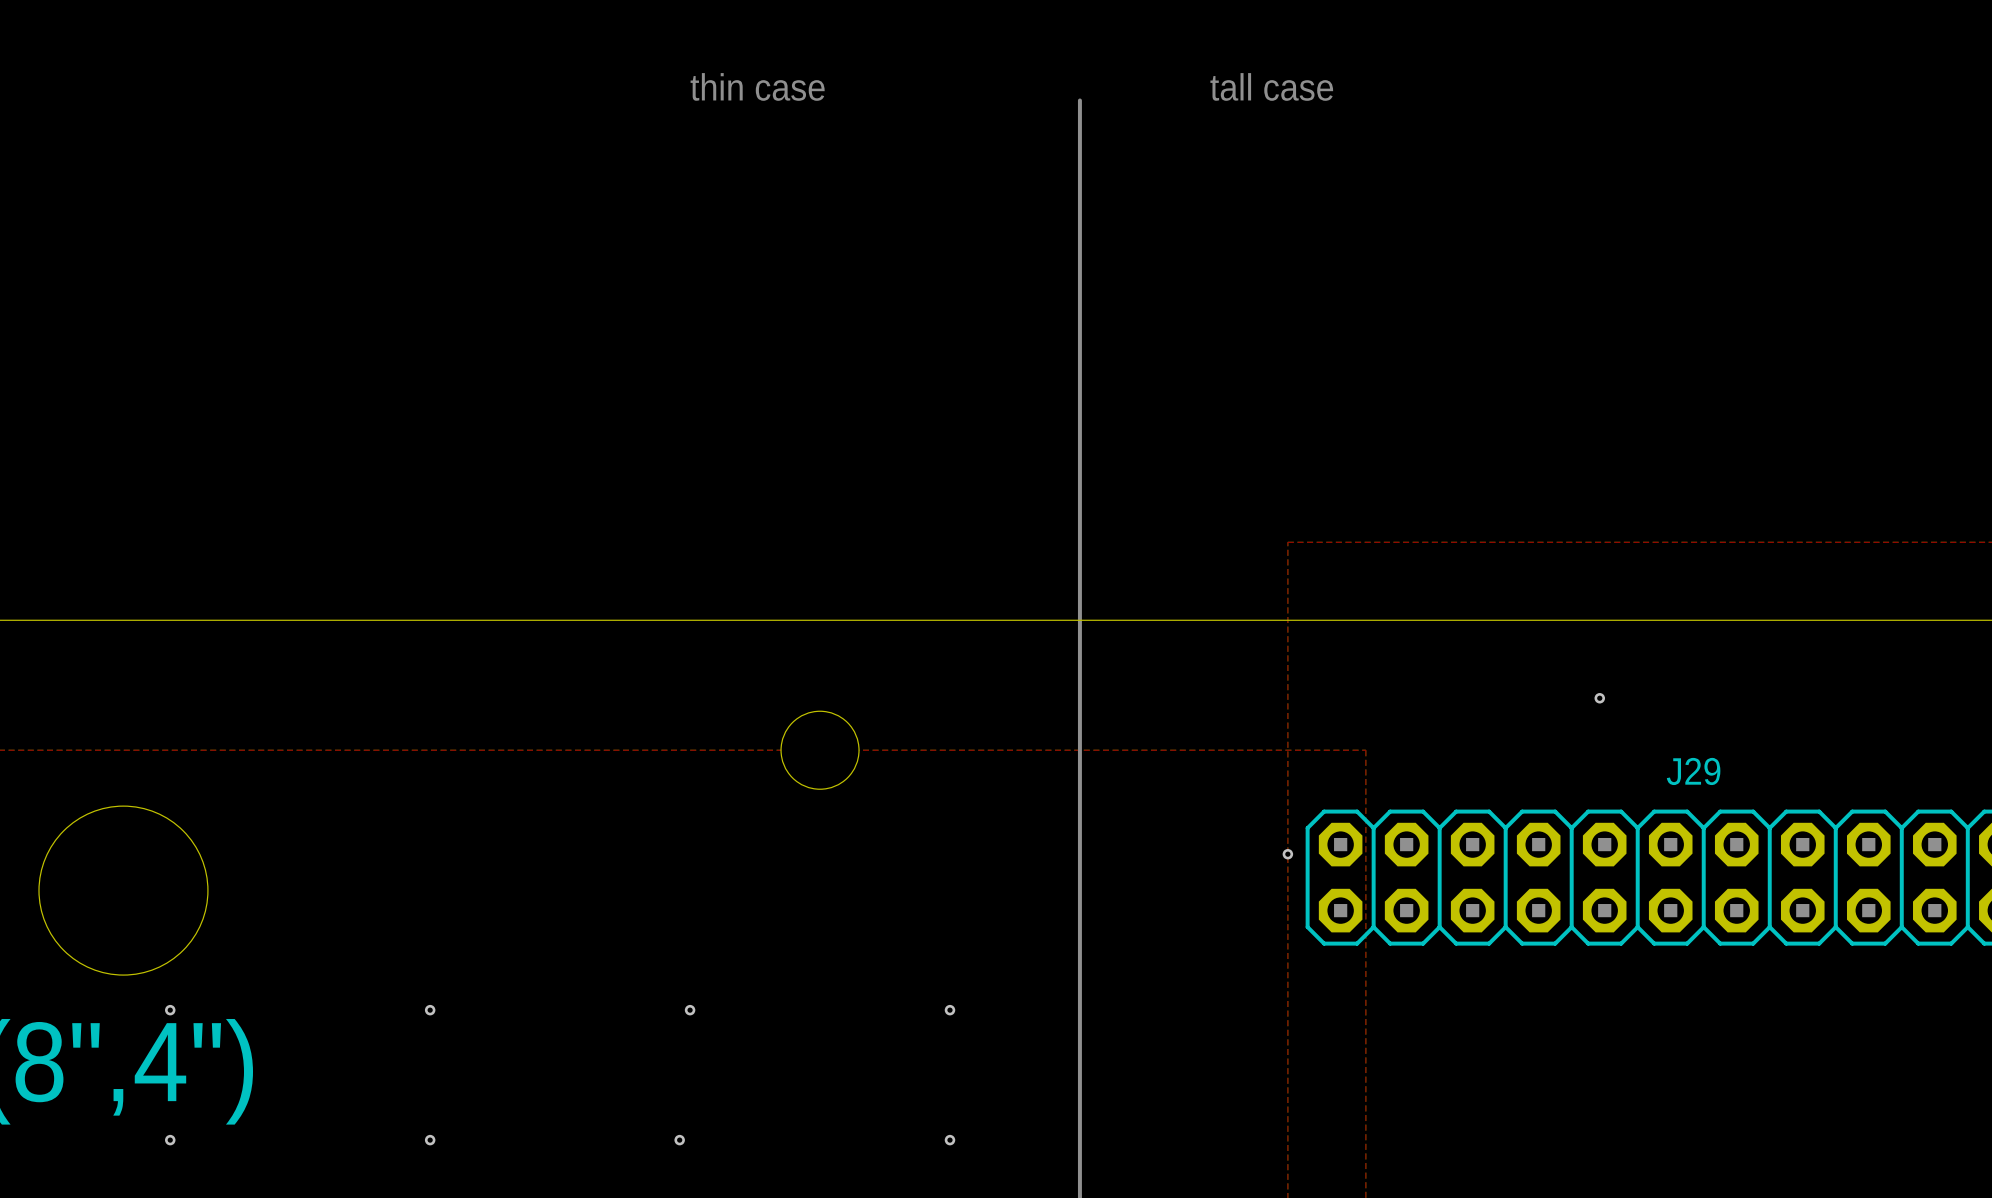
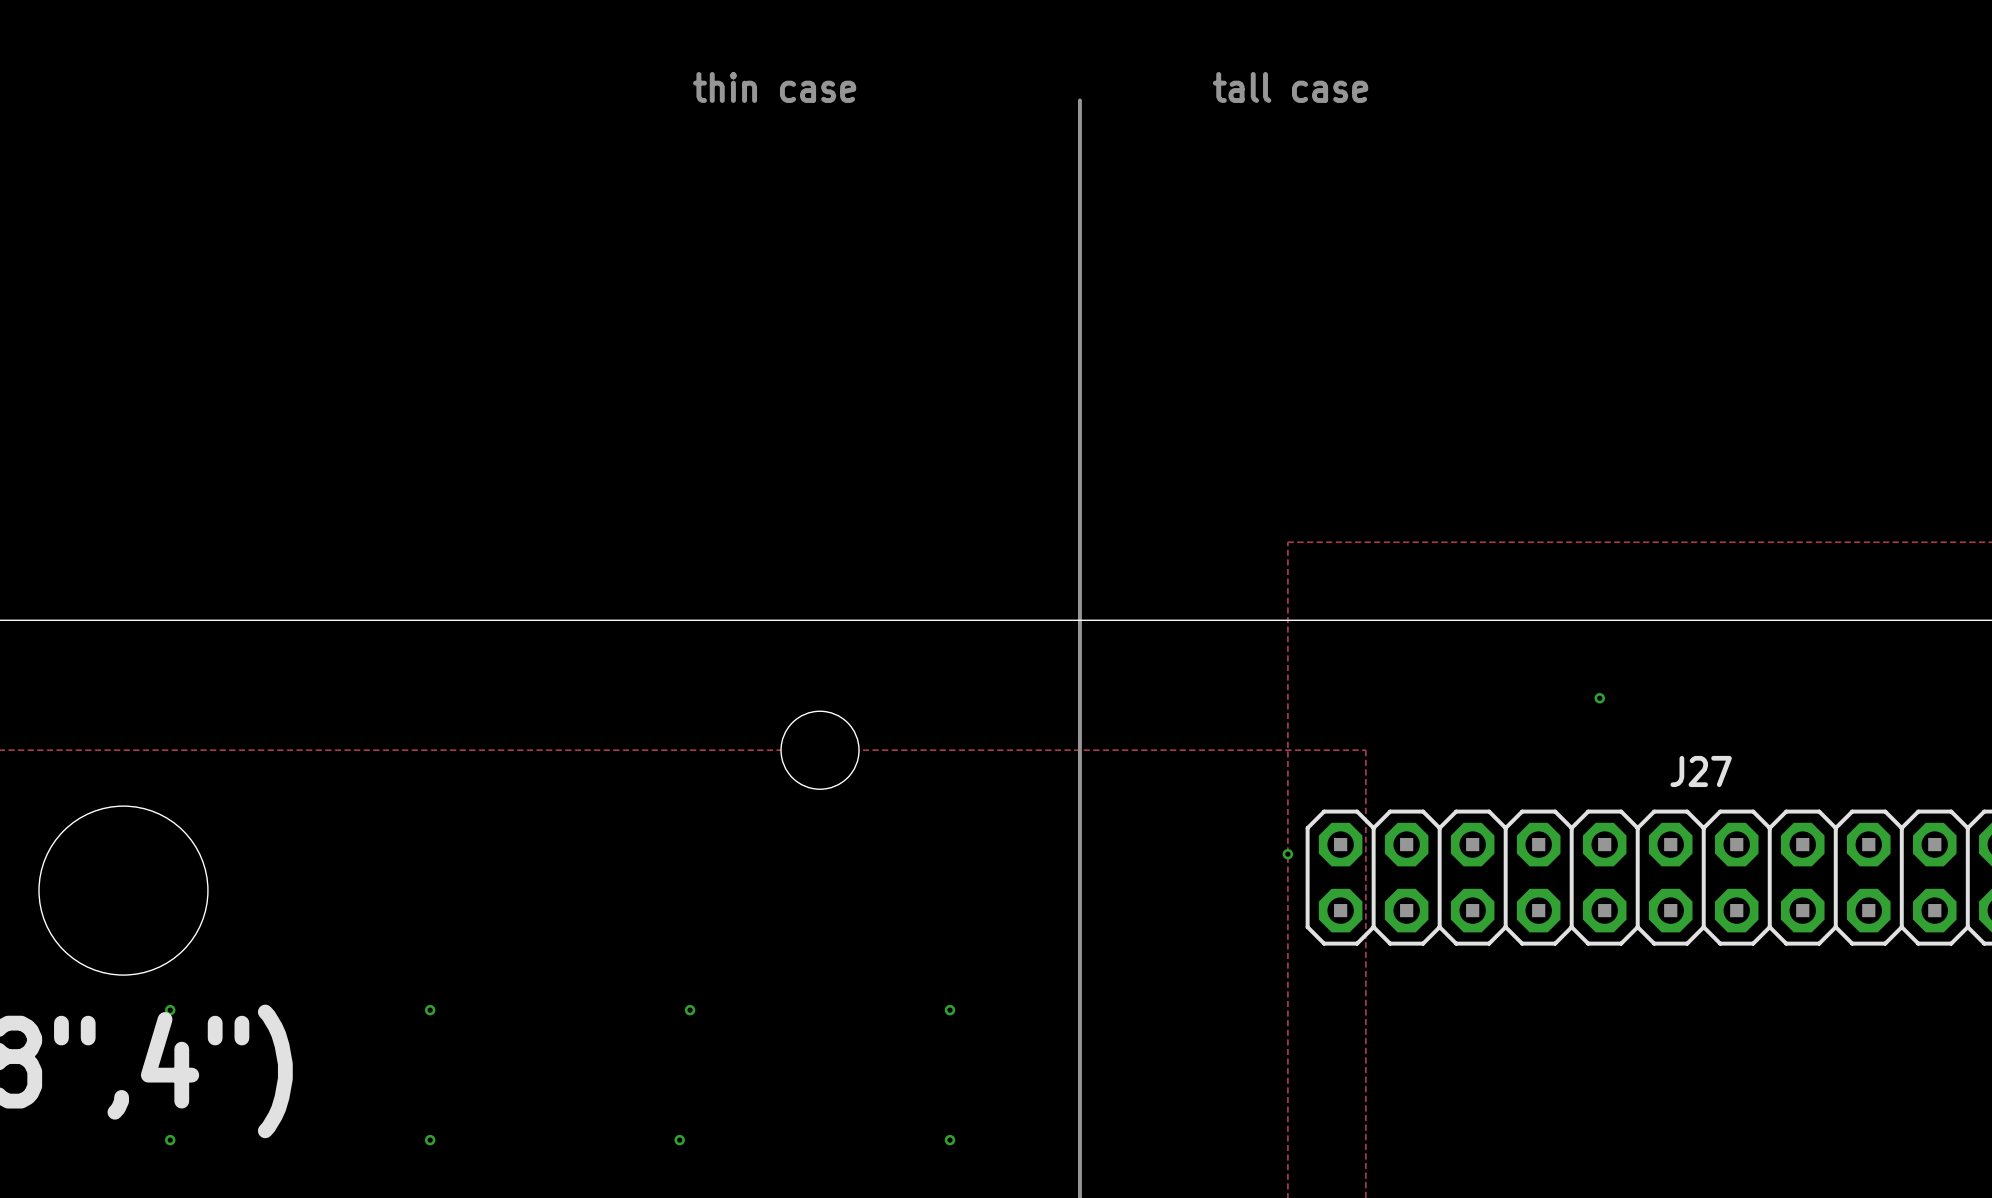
J29 name: J29 (1693, 771) -> J27 (1701, 771)

